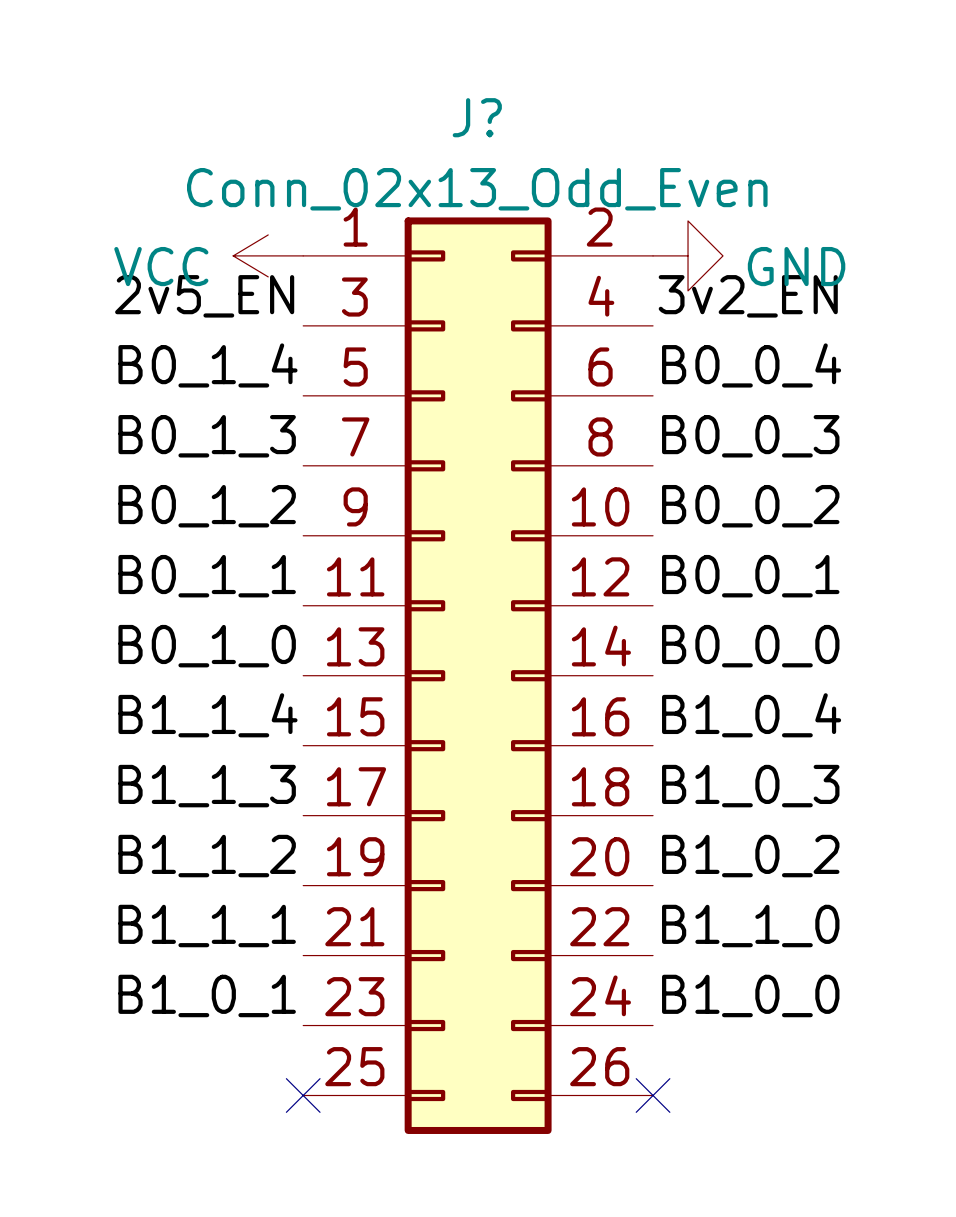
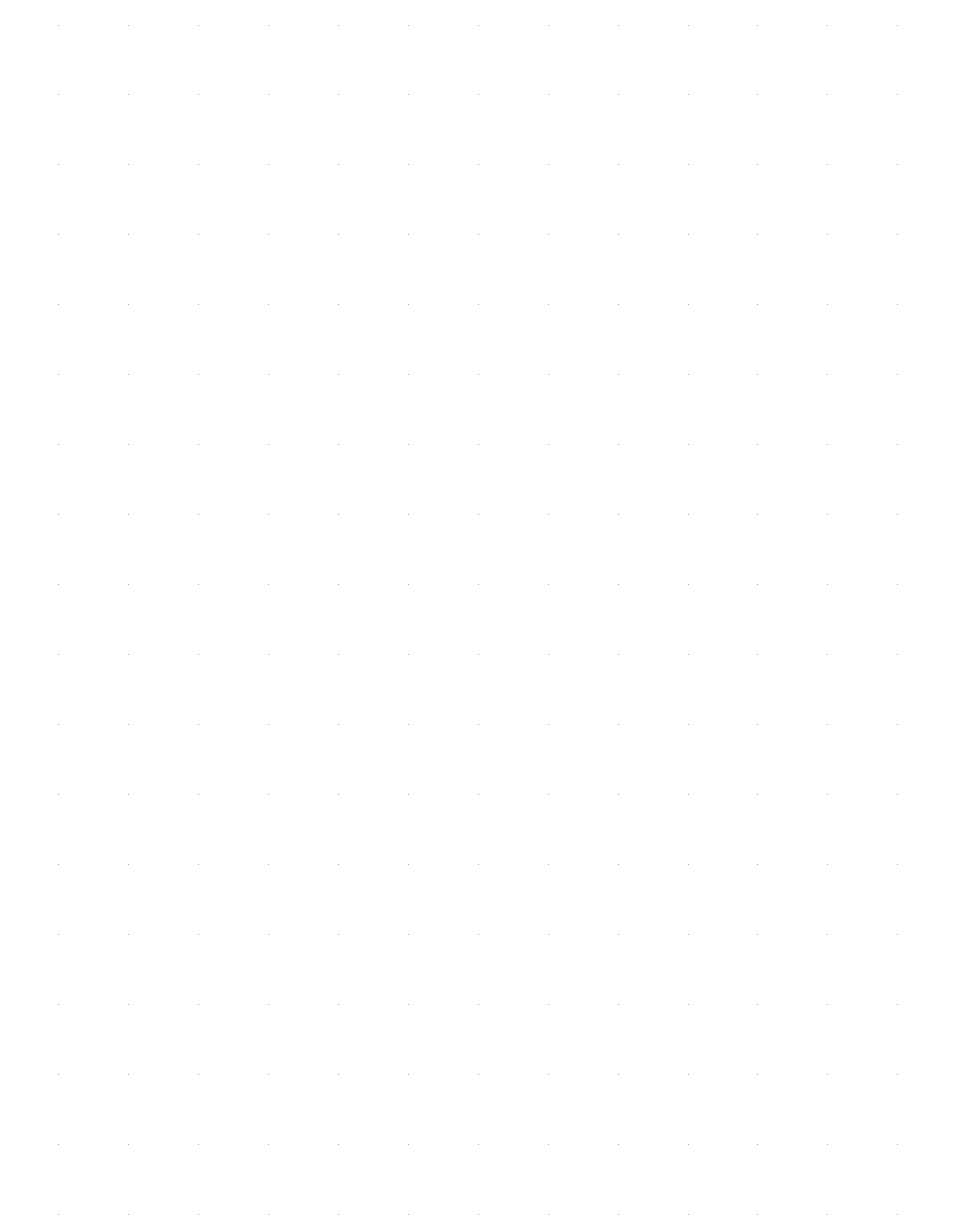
power symbol: VCC (268, 255) -> none
power symbol: GND (688, 255) -> none
label: 2v5_EN (204, 296) -> none
label: 3v2_EN (748, 296) -> none
label: B0_1_4 (207, 365) -> none
label: B0_0_4 (751, 365) -> none
label: B0_1_3 (207, 436) -> none
label: B0_0_3 (750, 436) -> none
label: B0_1_2 (207, 506) -> none
label: B0_0_2 (750, 506) -> none
label: B0_1_1 (207, 576) -> none
label: B0_0_1 (750, 576) -> none
label: B0_1_0 (207, 646) -> none
label: B0_0_0 (750, 646) -> none
J?: Conn_02x13_Odd_Even (478, 675) -> none
label: B1_1_4 (207, 715) -> none
label: B1_0_4 (751, 715) -> none
label: B1_1_3 (207, 786) -> none
label: B1_0_3 (750, 786) -> none
label: B1_1_2 (207, 856) -> none
label: B1_0_2 (750, 856) -> none
label: B1_1_1 (207, 926) -> none
label: B1_1_0 (750, 926) -> none
label: B1_0_1 (207, 995) -> none
label: B1_0_0 (750, 995) -> none
no-connect mark: (303, 1095) -> none
no-connect mark: (653, 1095) -> none

